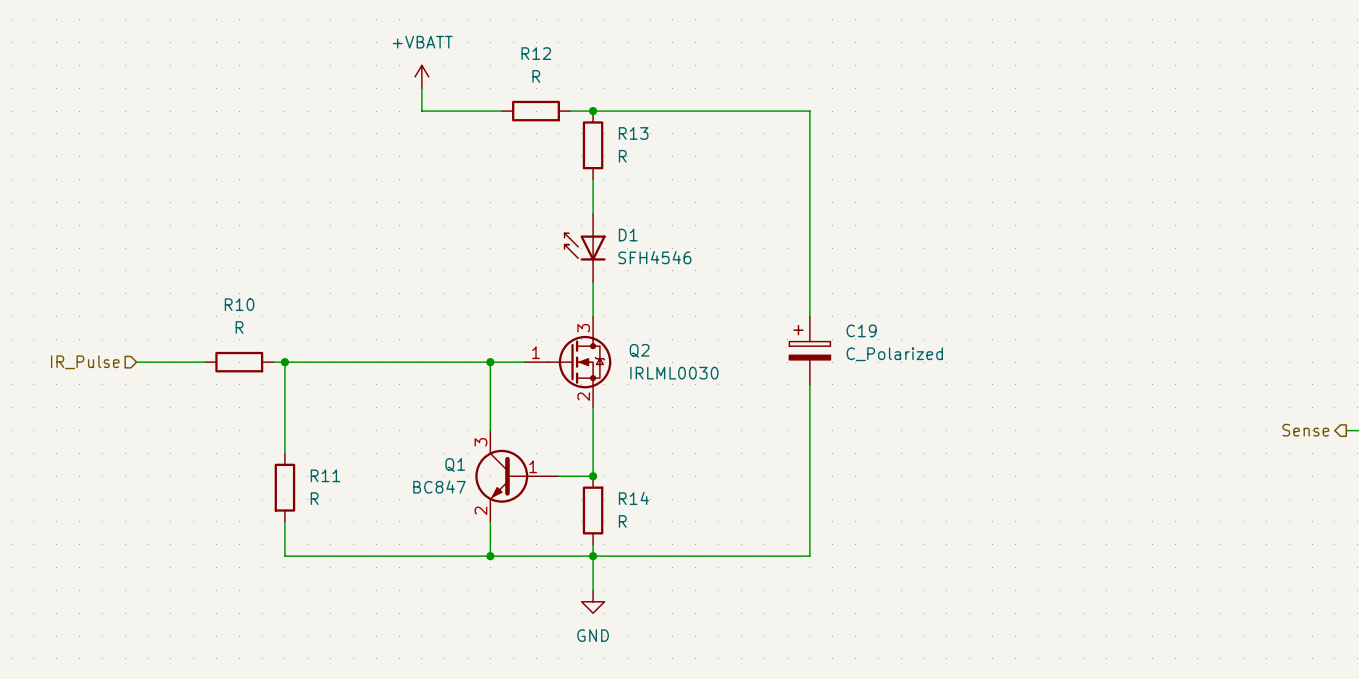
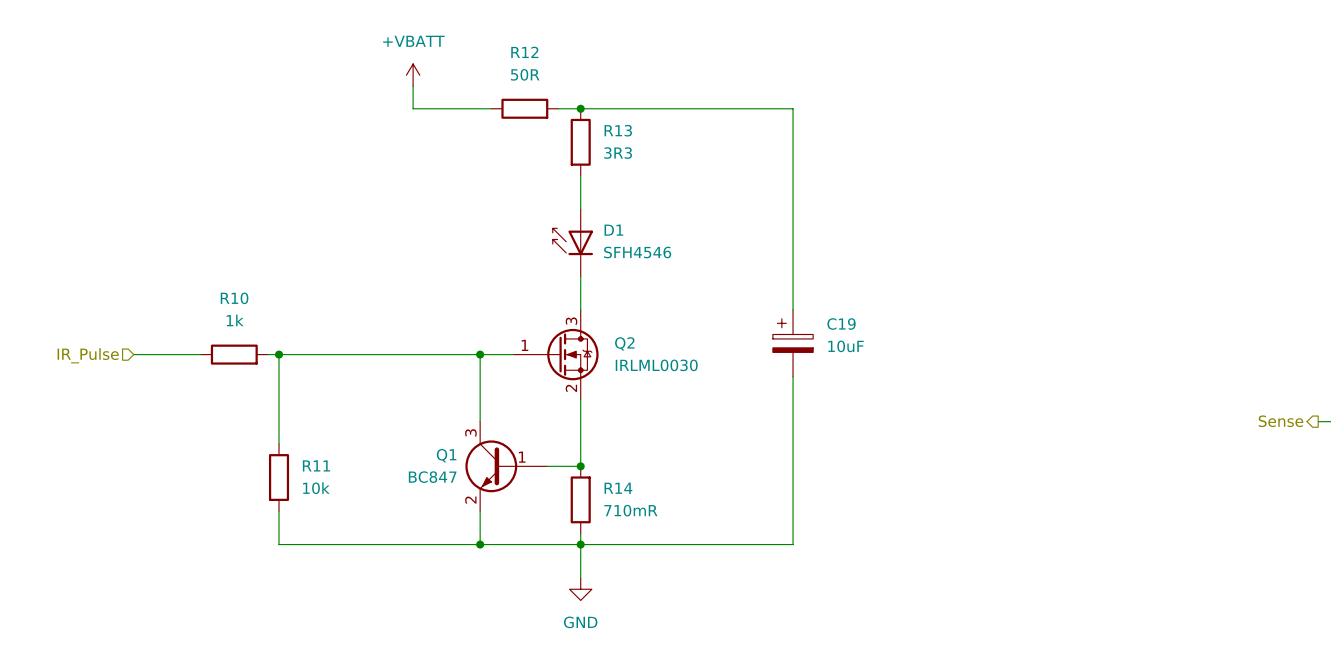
R12 value: R (536, 76) -> 50R (525, 74)
R13 value: R (622, 156) -> 3R3 (618, 153)
R10 value: R (239, 327) -> 1k (235, 320)
C19 value: C_Polarized (894, 354) -> 10uF (845, 346)
R11 value: R (314, 498) -> 10k (316, 488)
R14 value: R (622, 521) -> 710mR (630, 510)

